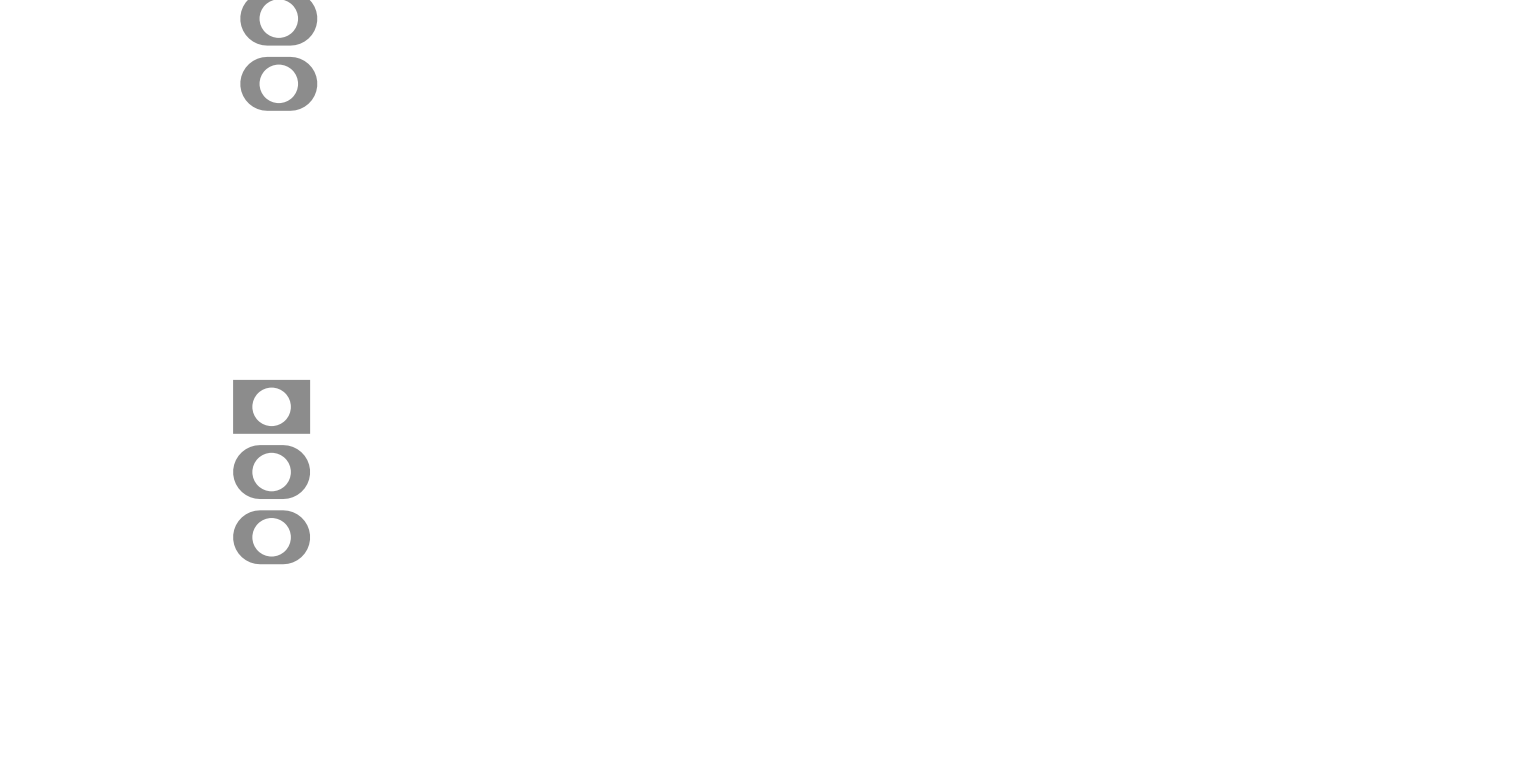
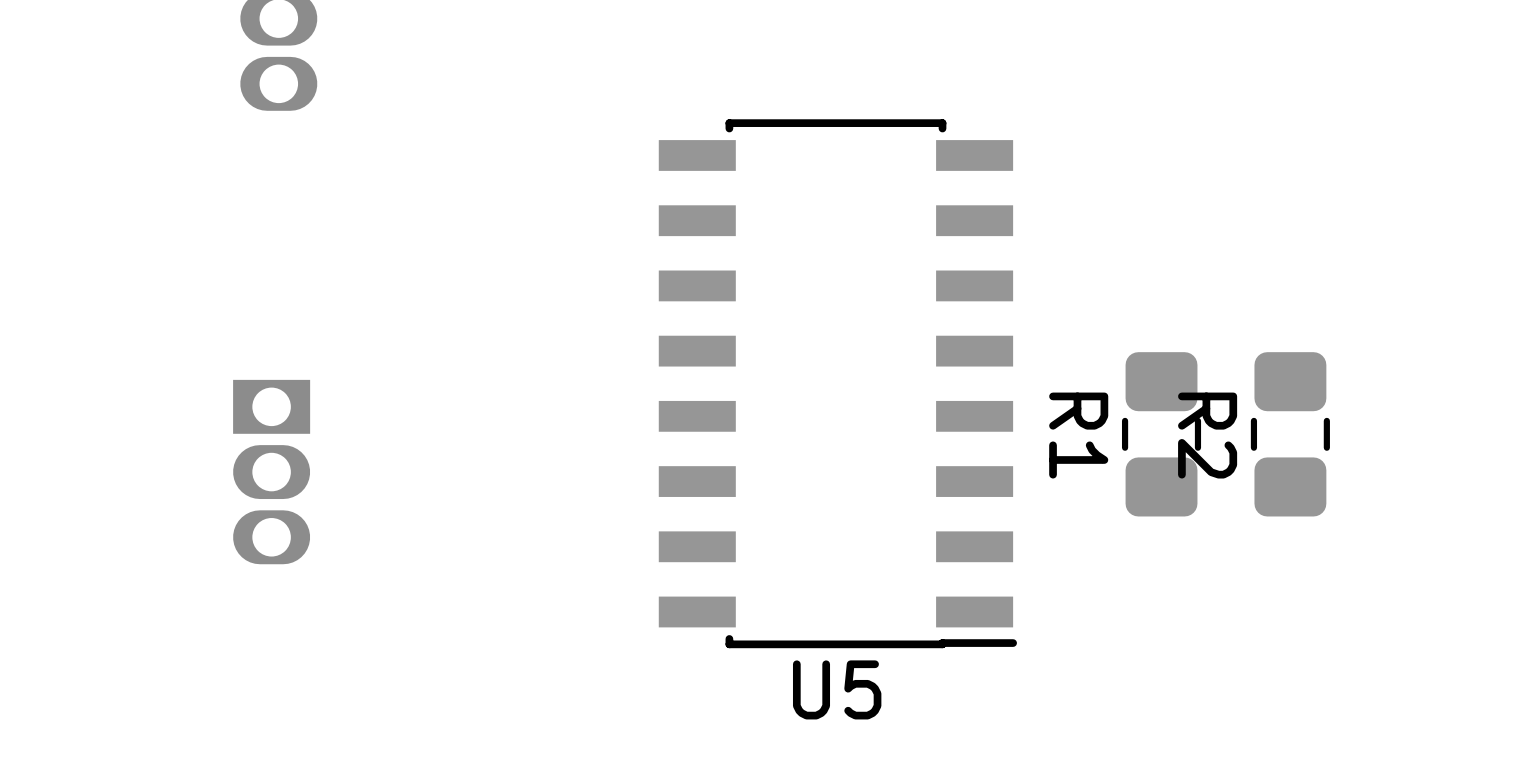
U5: none -> (837, 383)
R1: none -> (1161, 434)
R2: none -> (1290, 434)

